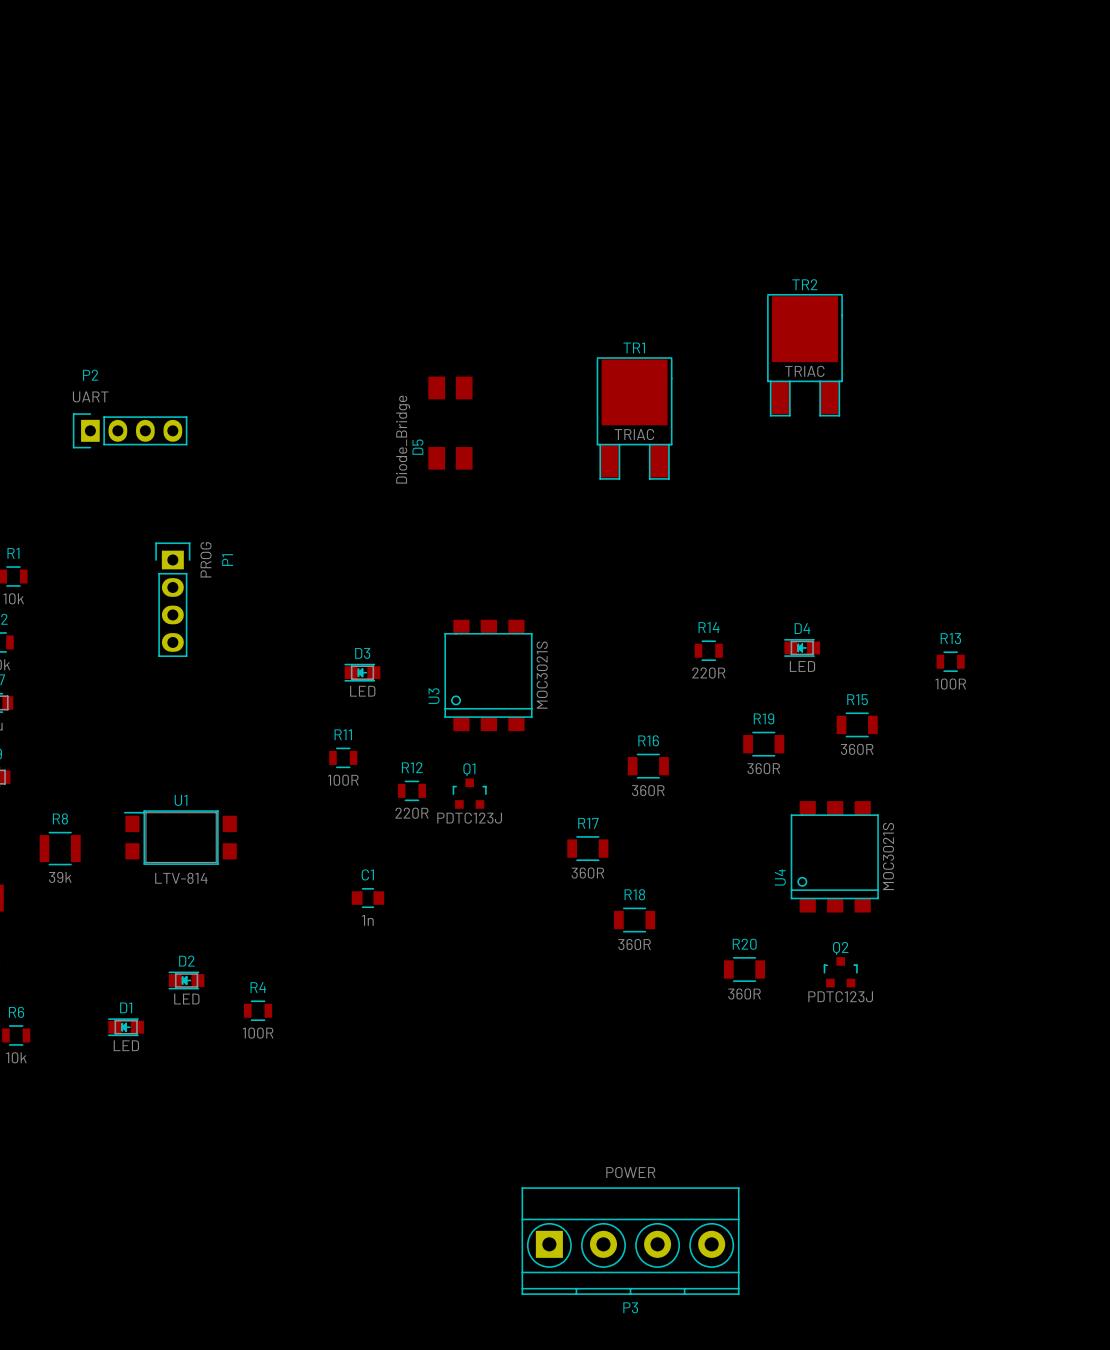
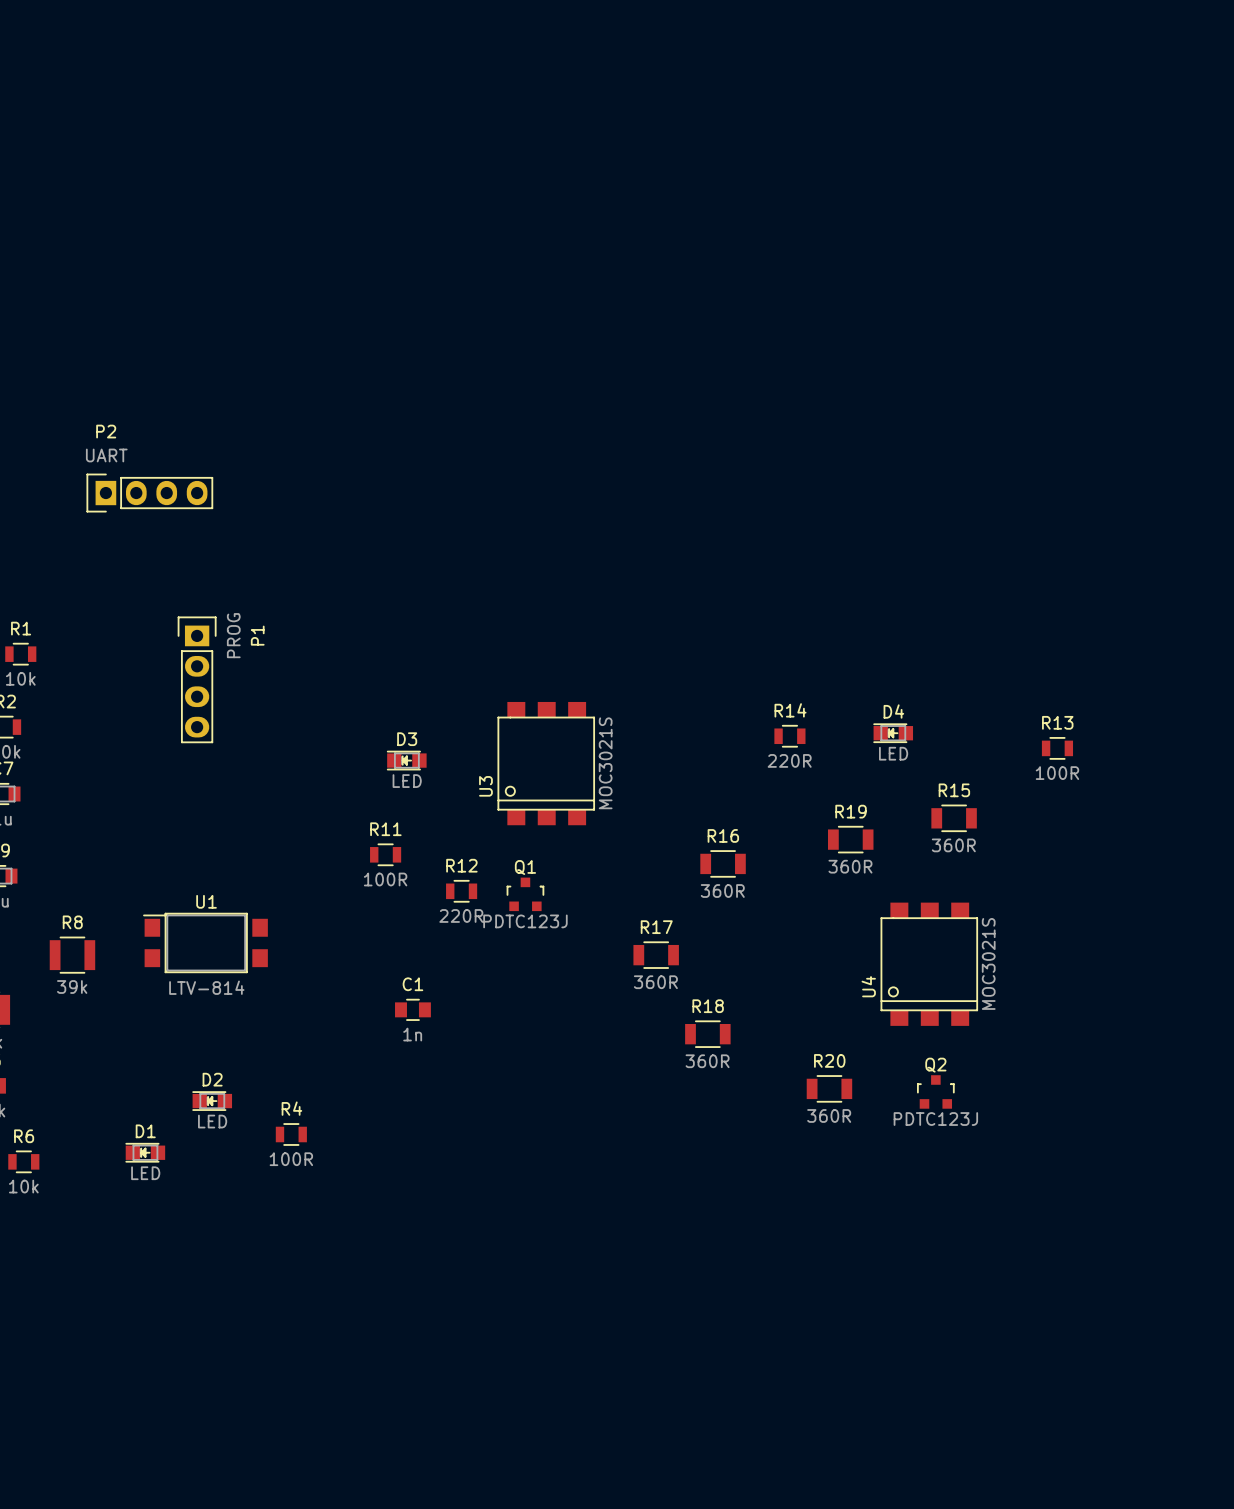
TR2: TRIAC (804, 355) -> none
TR1: TRIAC (634, 418) -> none
D5: Diode_Bridge (450, 423) -> none
P3: POWER (630, 1241) -> none

